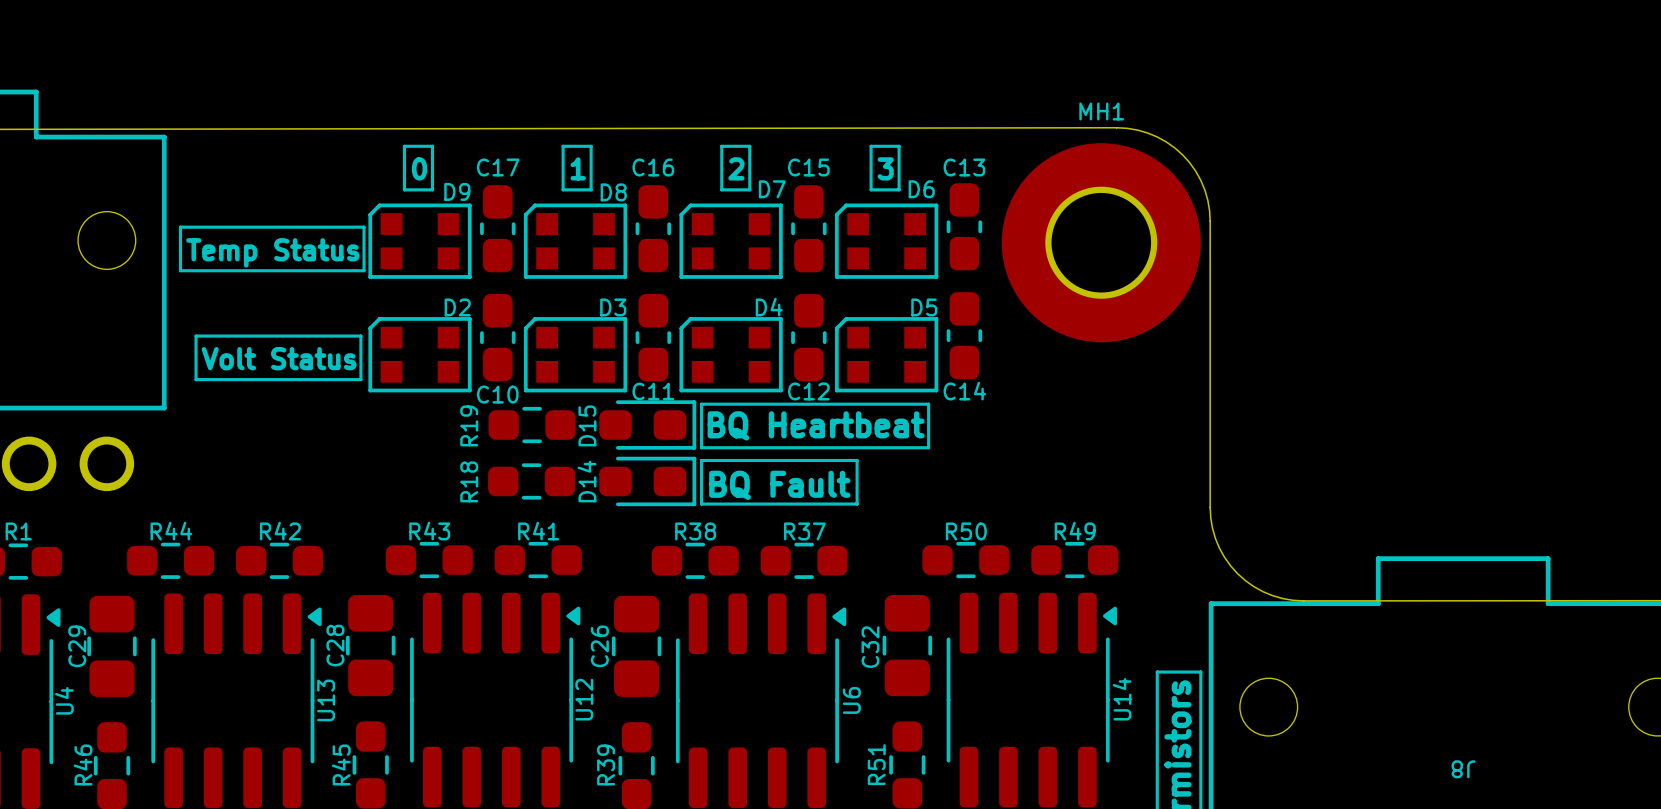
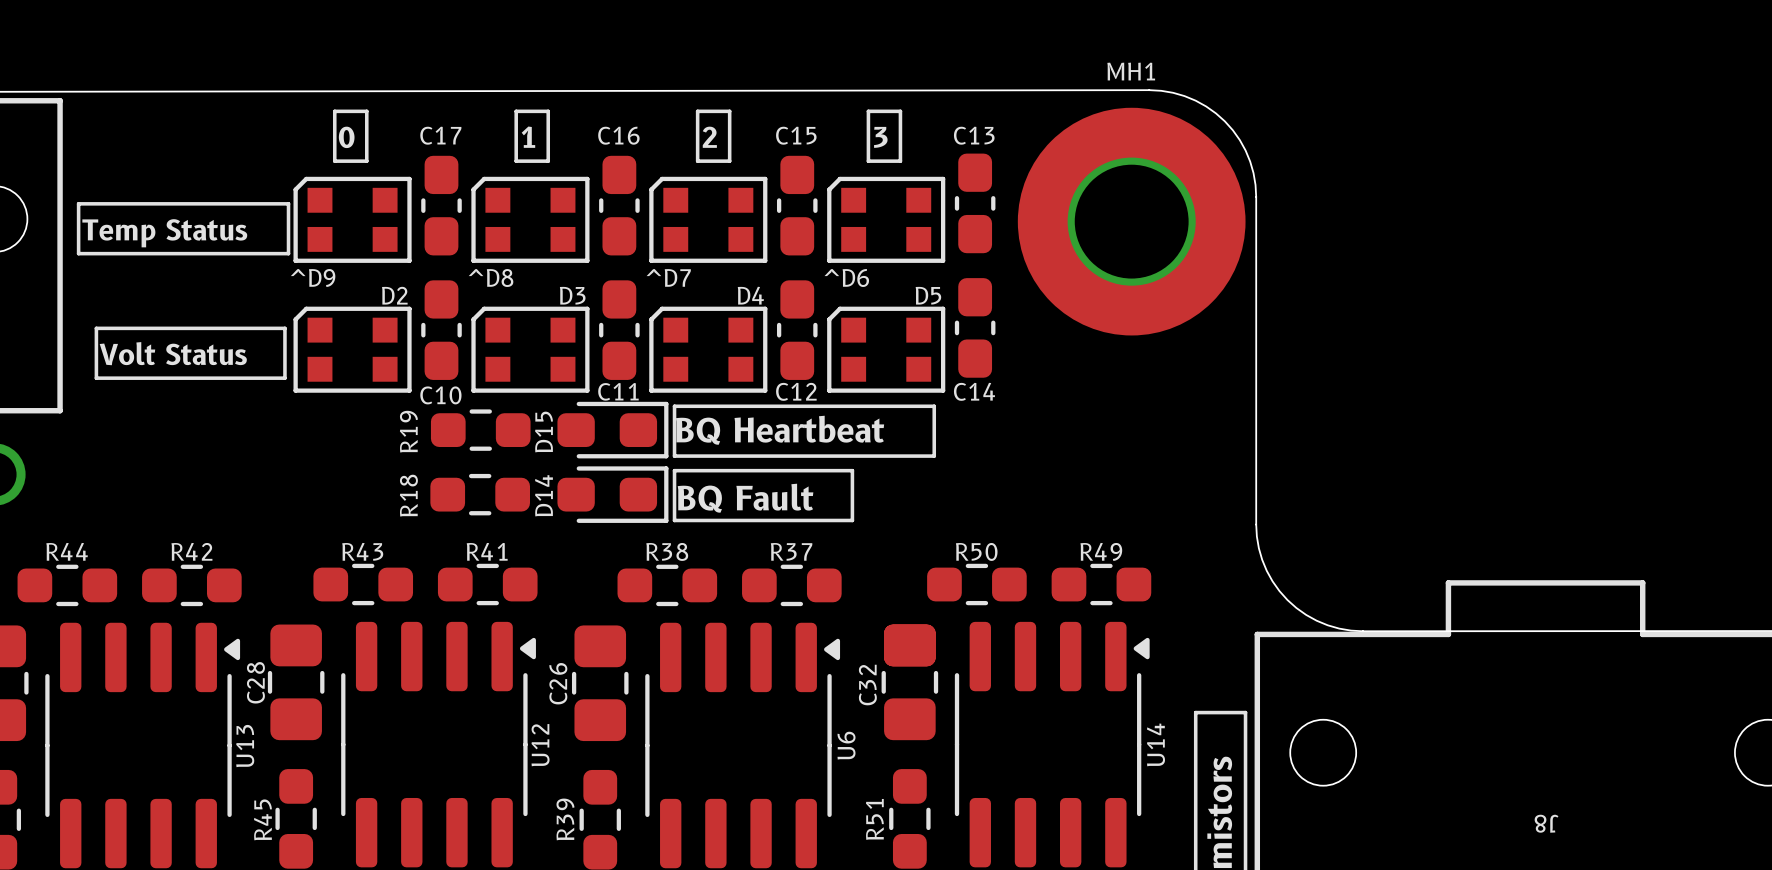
D7 name: D7 (772, 189) -> ^D7 (668, 277)
D6 name: D6 (921, 189) -> ^D6 (846, 278)
D9 name: D9 (457, 191) -> ^D9 (313, 278)
D8 name: D8 (613, 192) -> ^D8 (491, 278)
part: none -> (909, 645)

